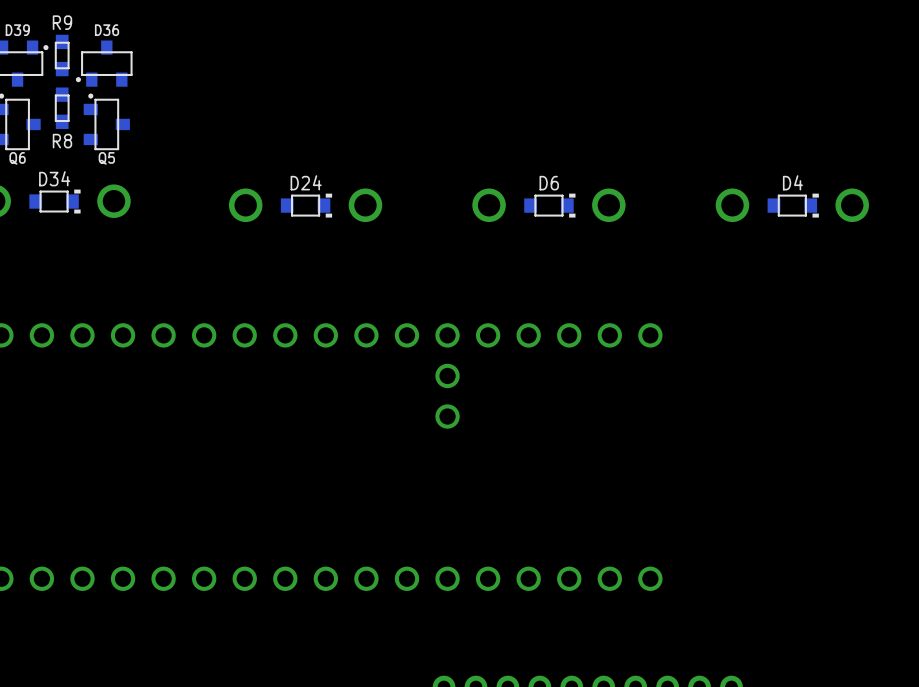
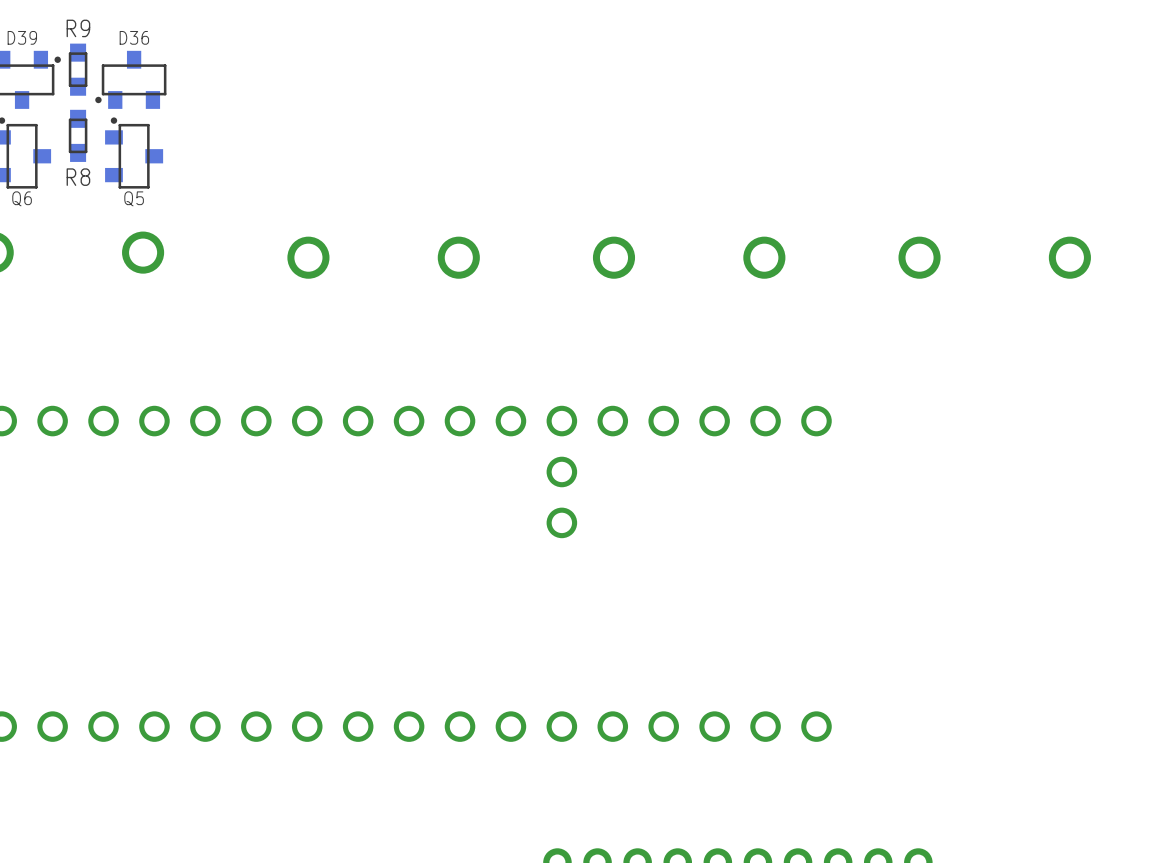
D34: (54, 201) -> none
D24: (306, 205) -> none
D6: (549, 205) -> none
D4: (793, 205) -> none

